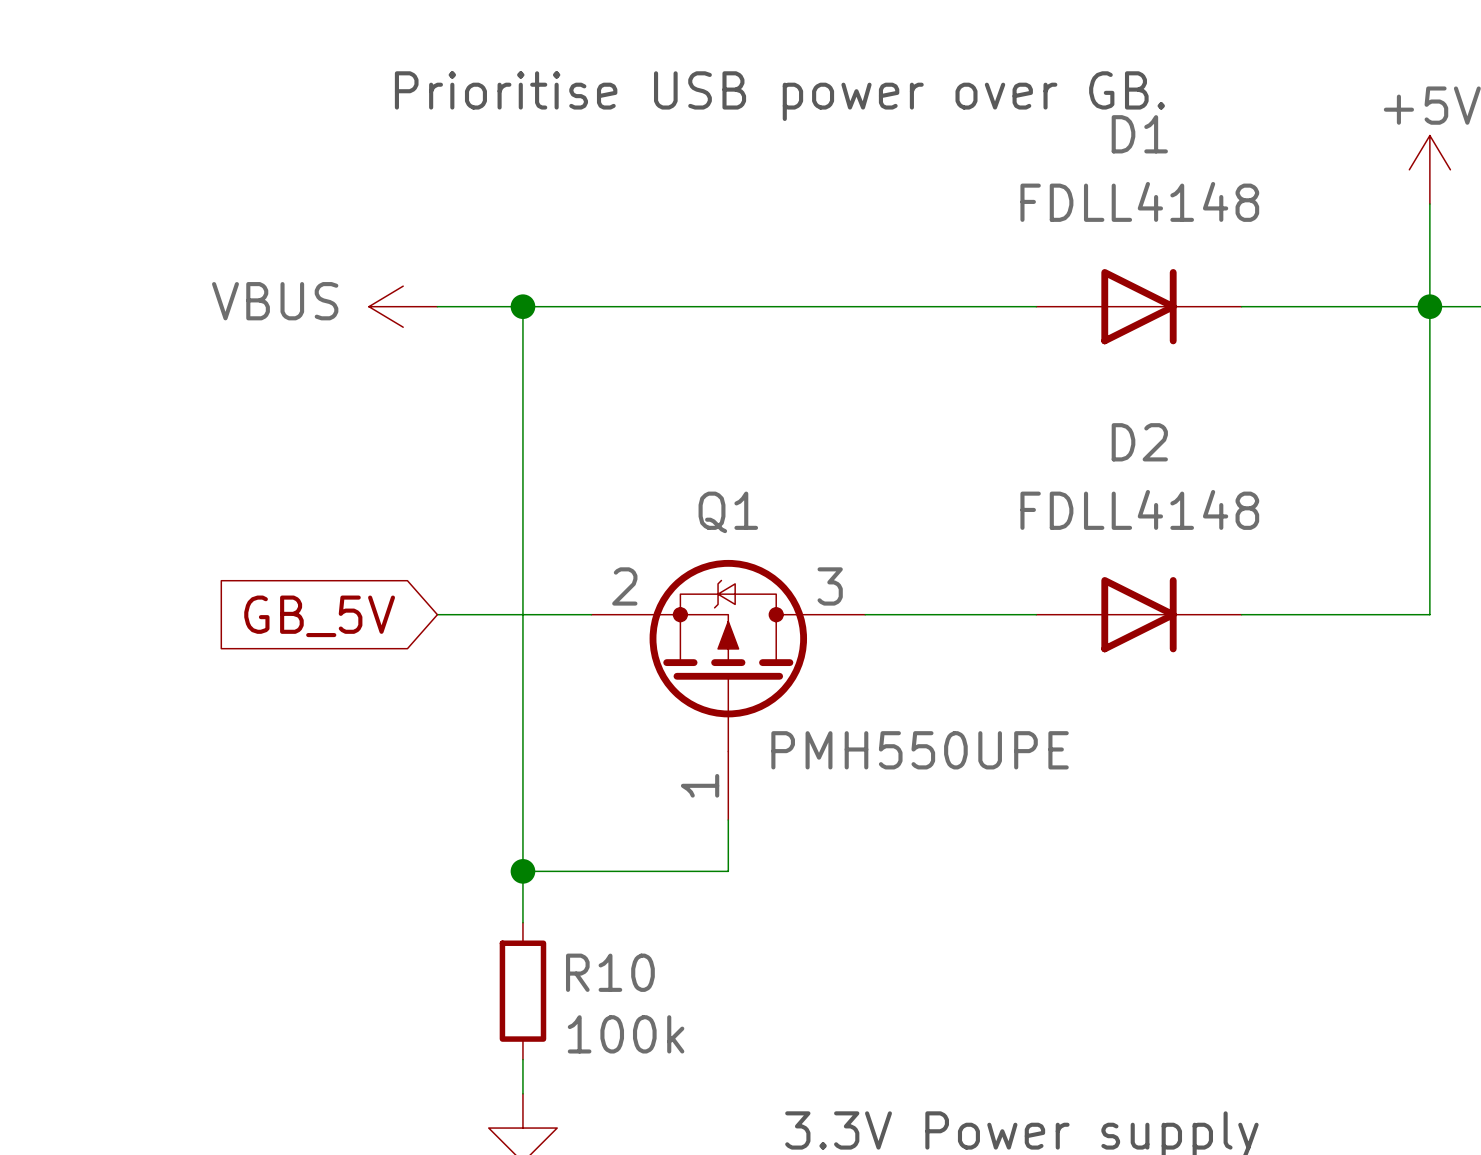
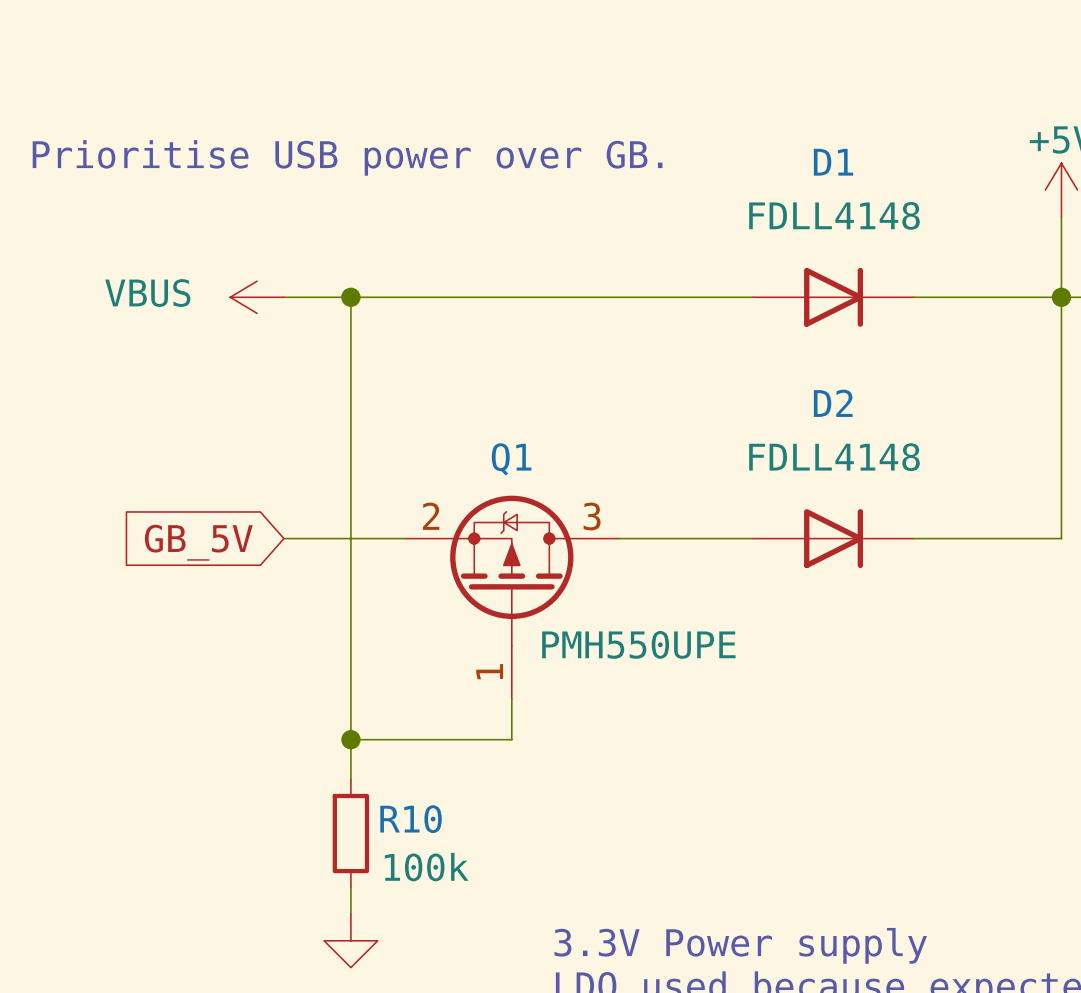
text position: Prioritise USB power over GB. (779, 96) -> Prioritise USB power over GB. (347, 157)

